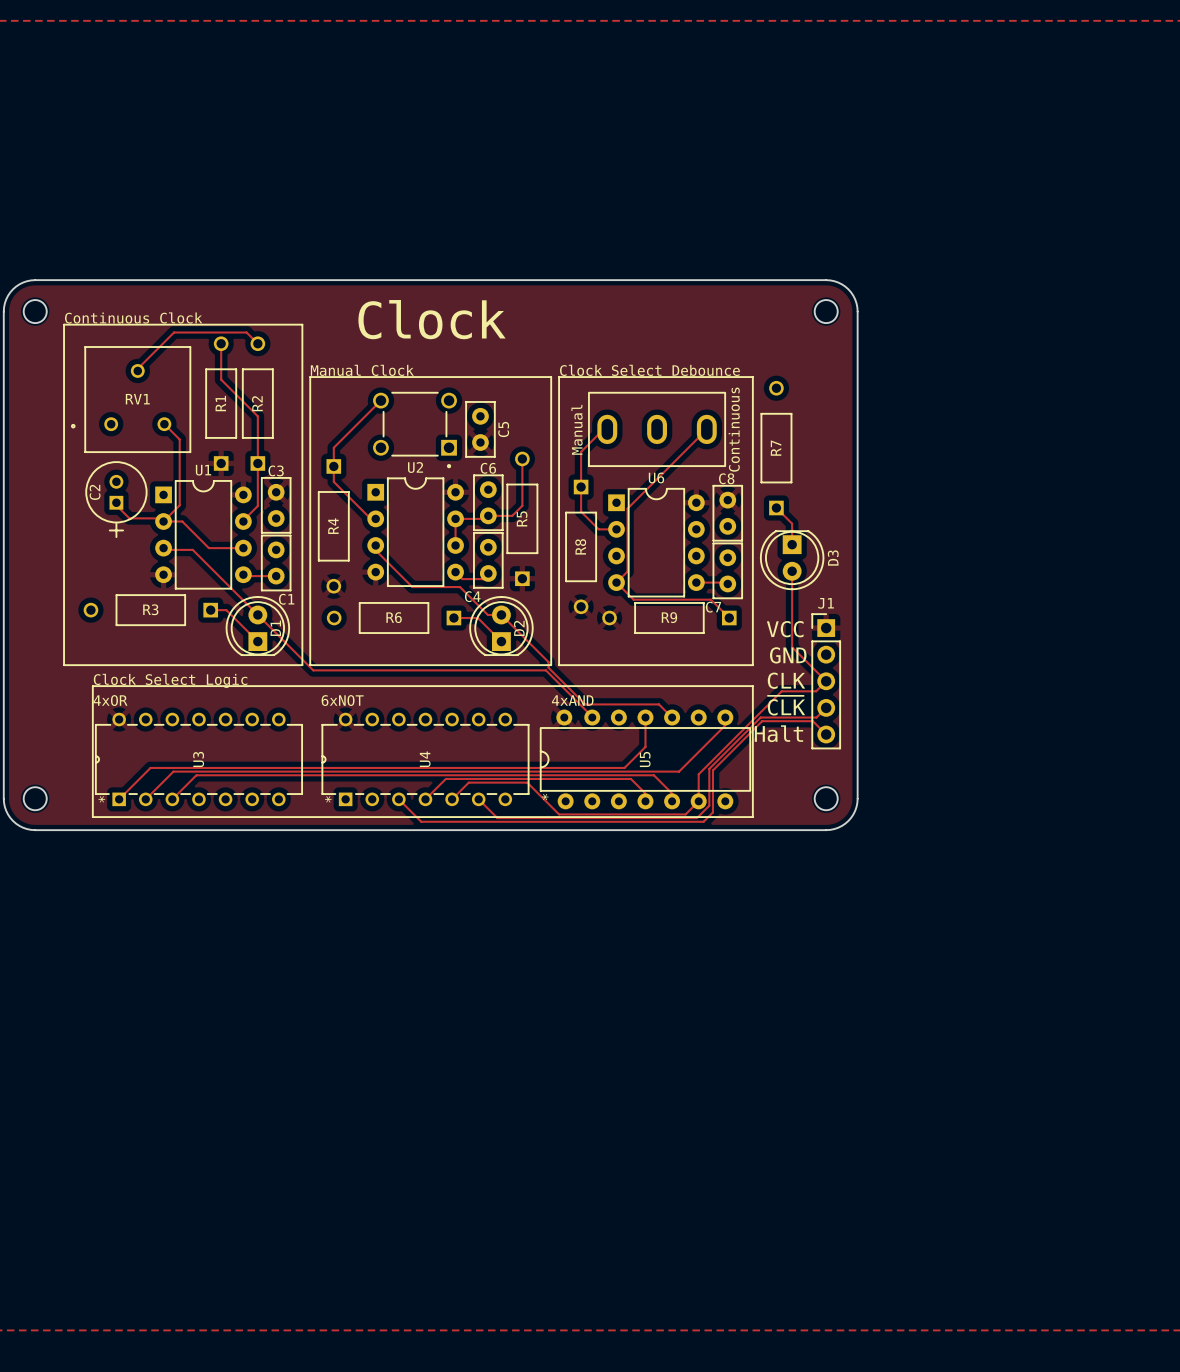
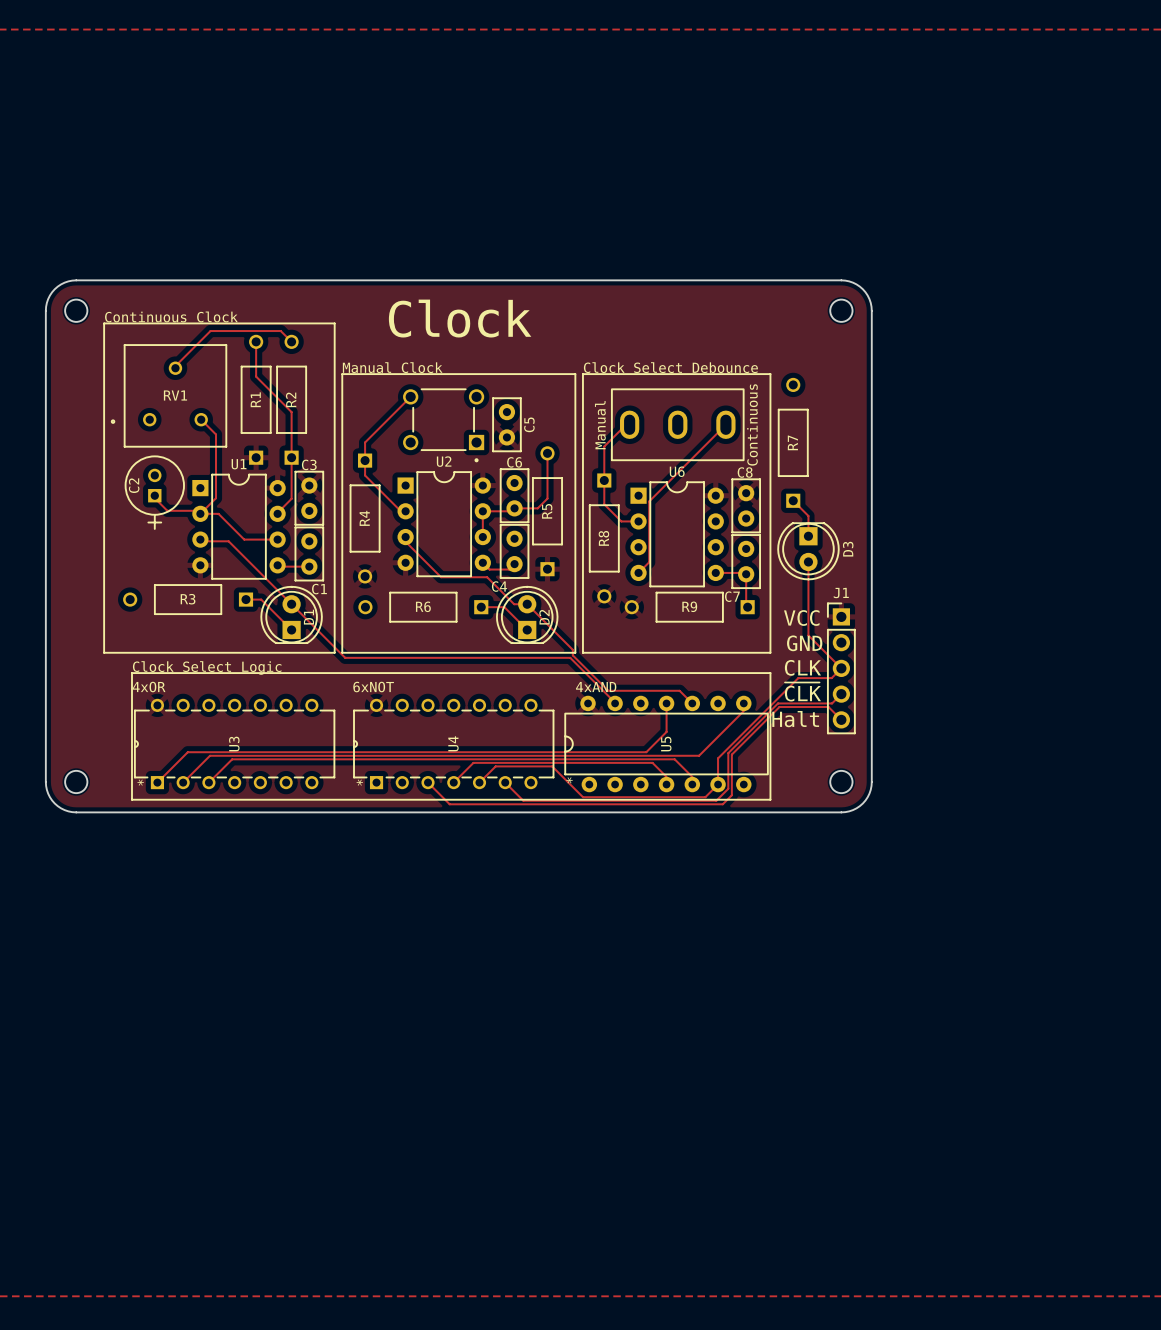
track: (616, 582) (633, 599) (710, 599) (727, 616) -> (746, 574) (746, 605)

